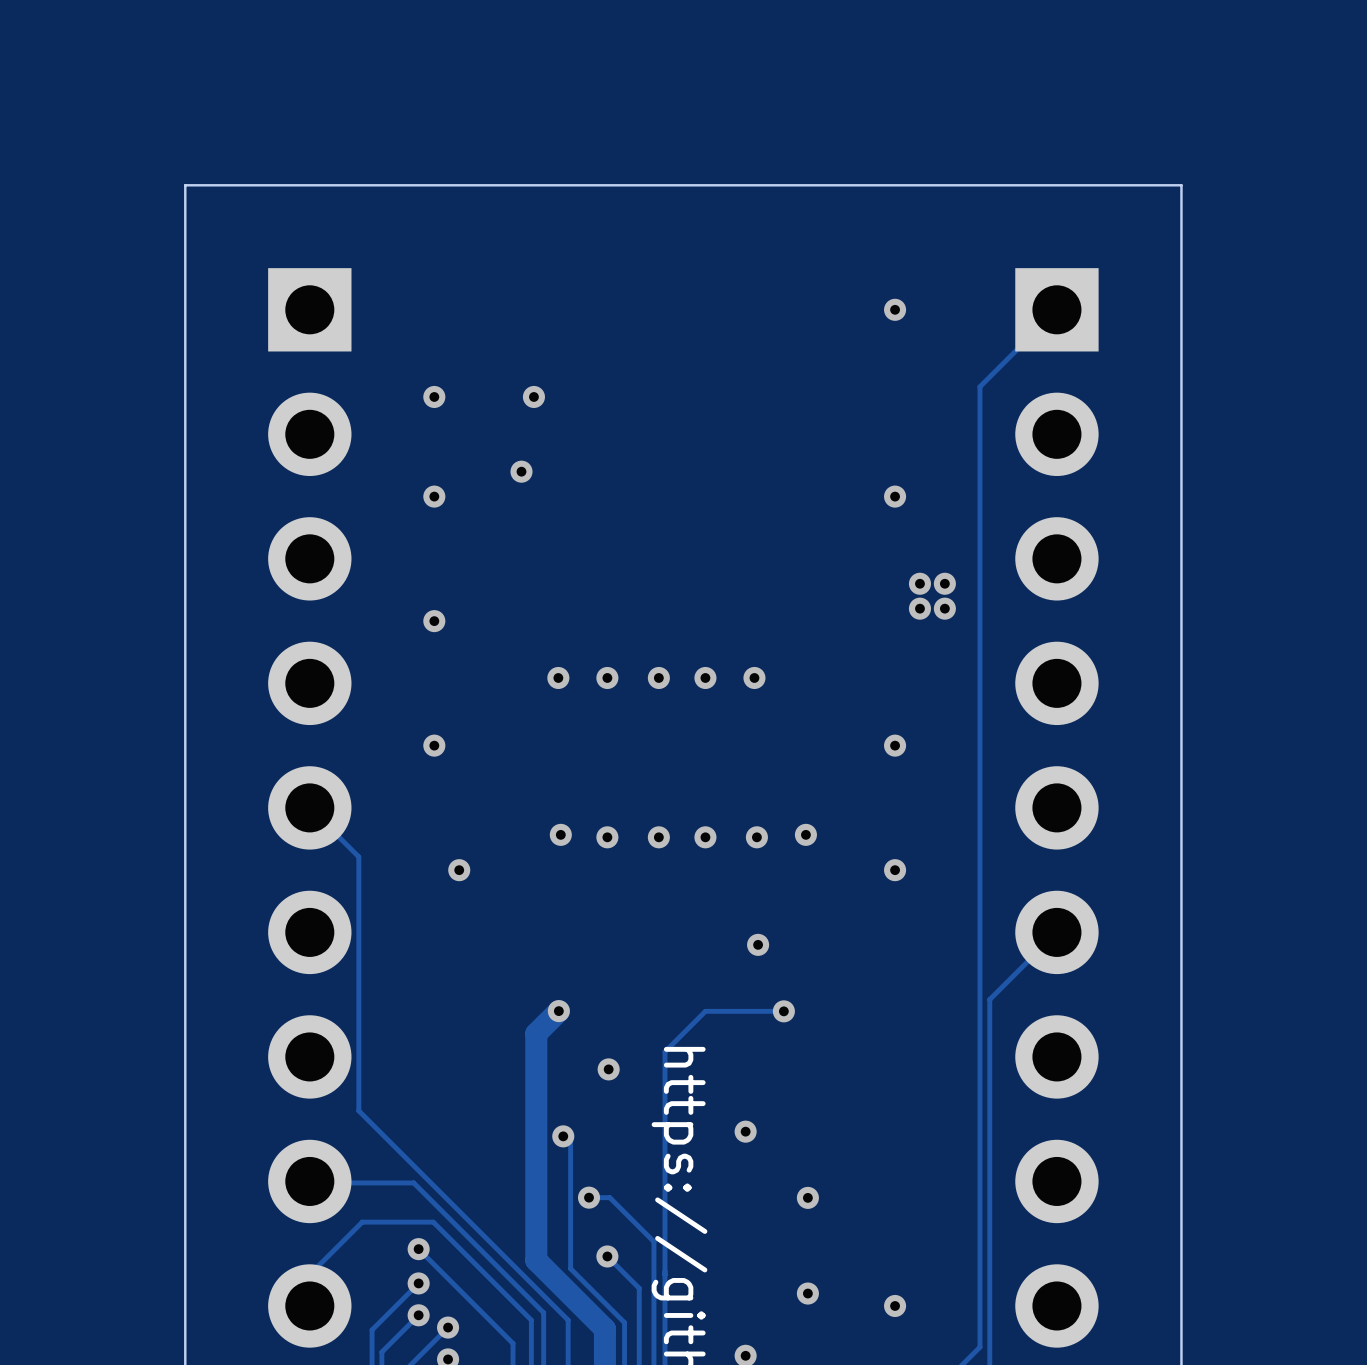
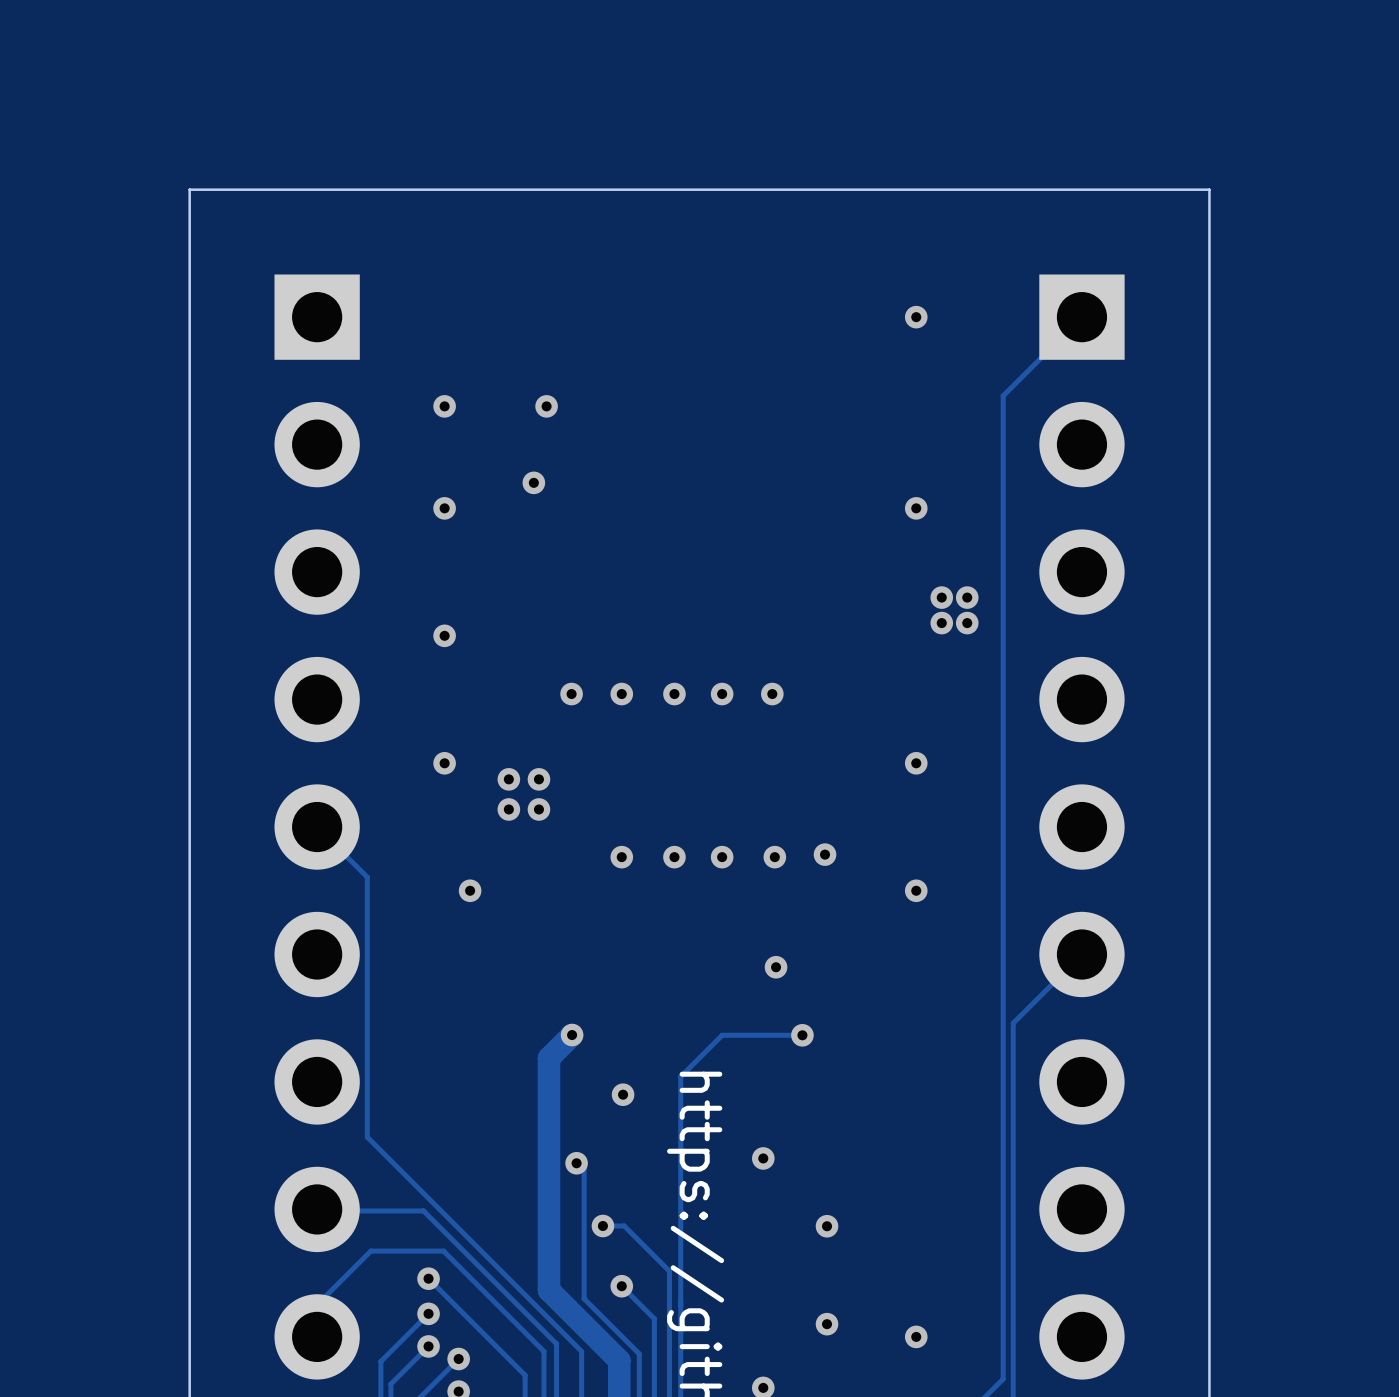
via: none -> (508, 779)
via: none -> (538, 779)
via: none -> (508, 809)
via: none -> (538, 809)
via: (560, 834) -> none

